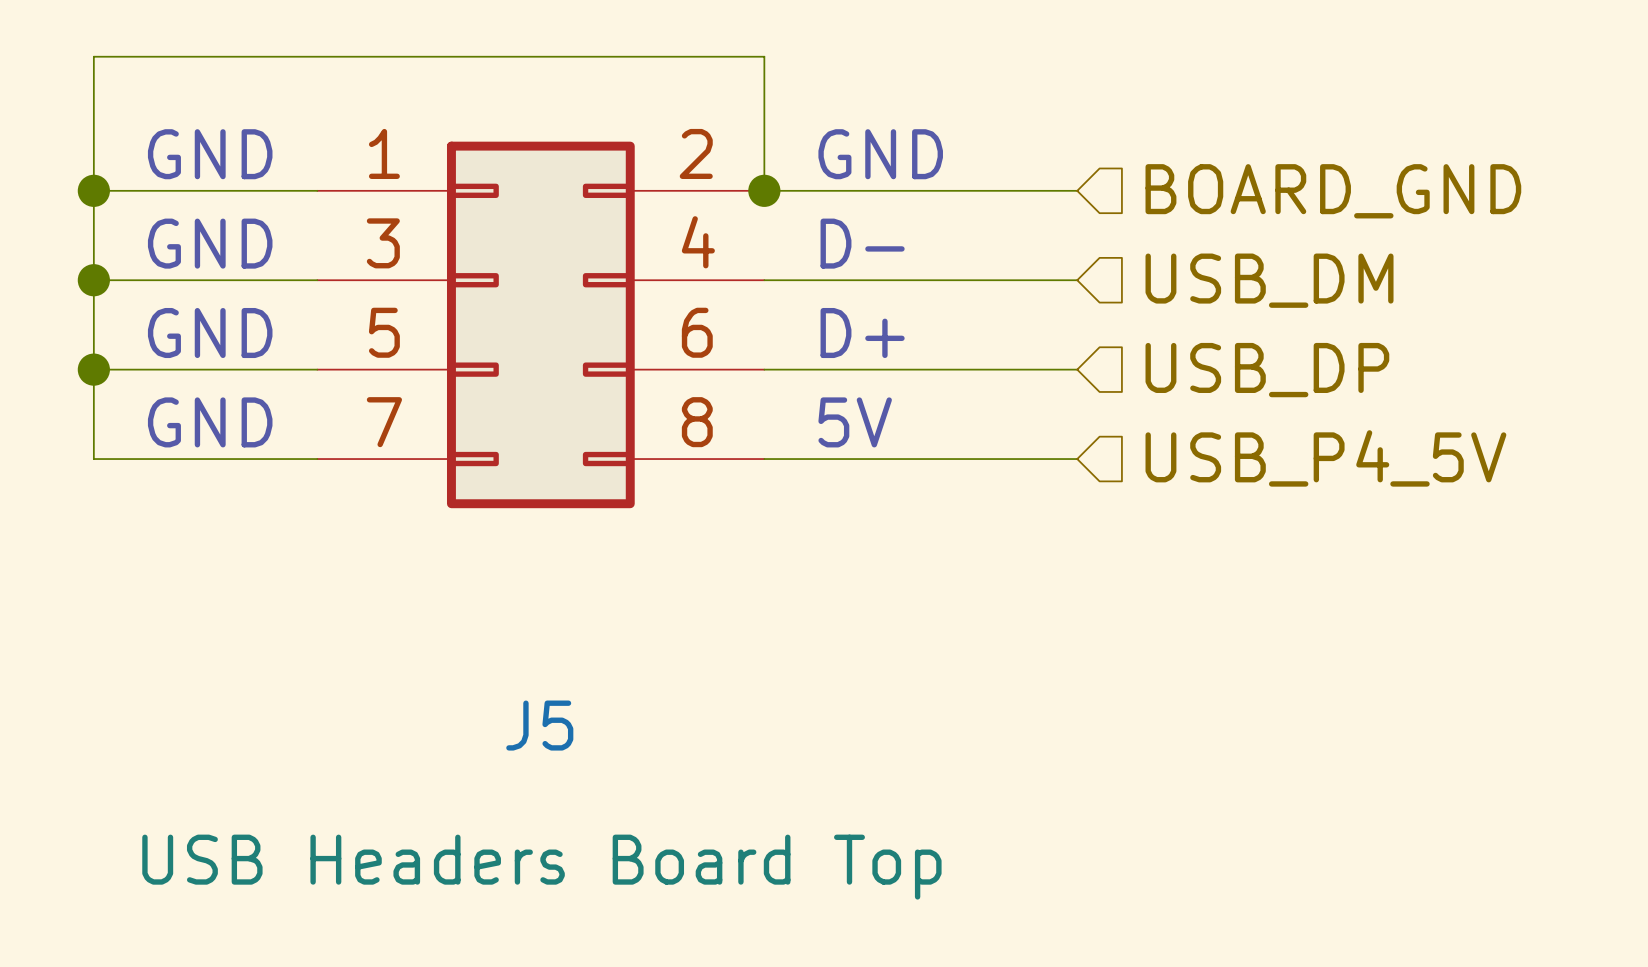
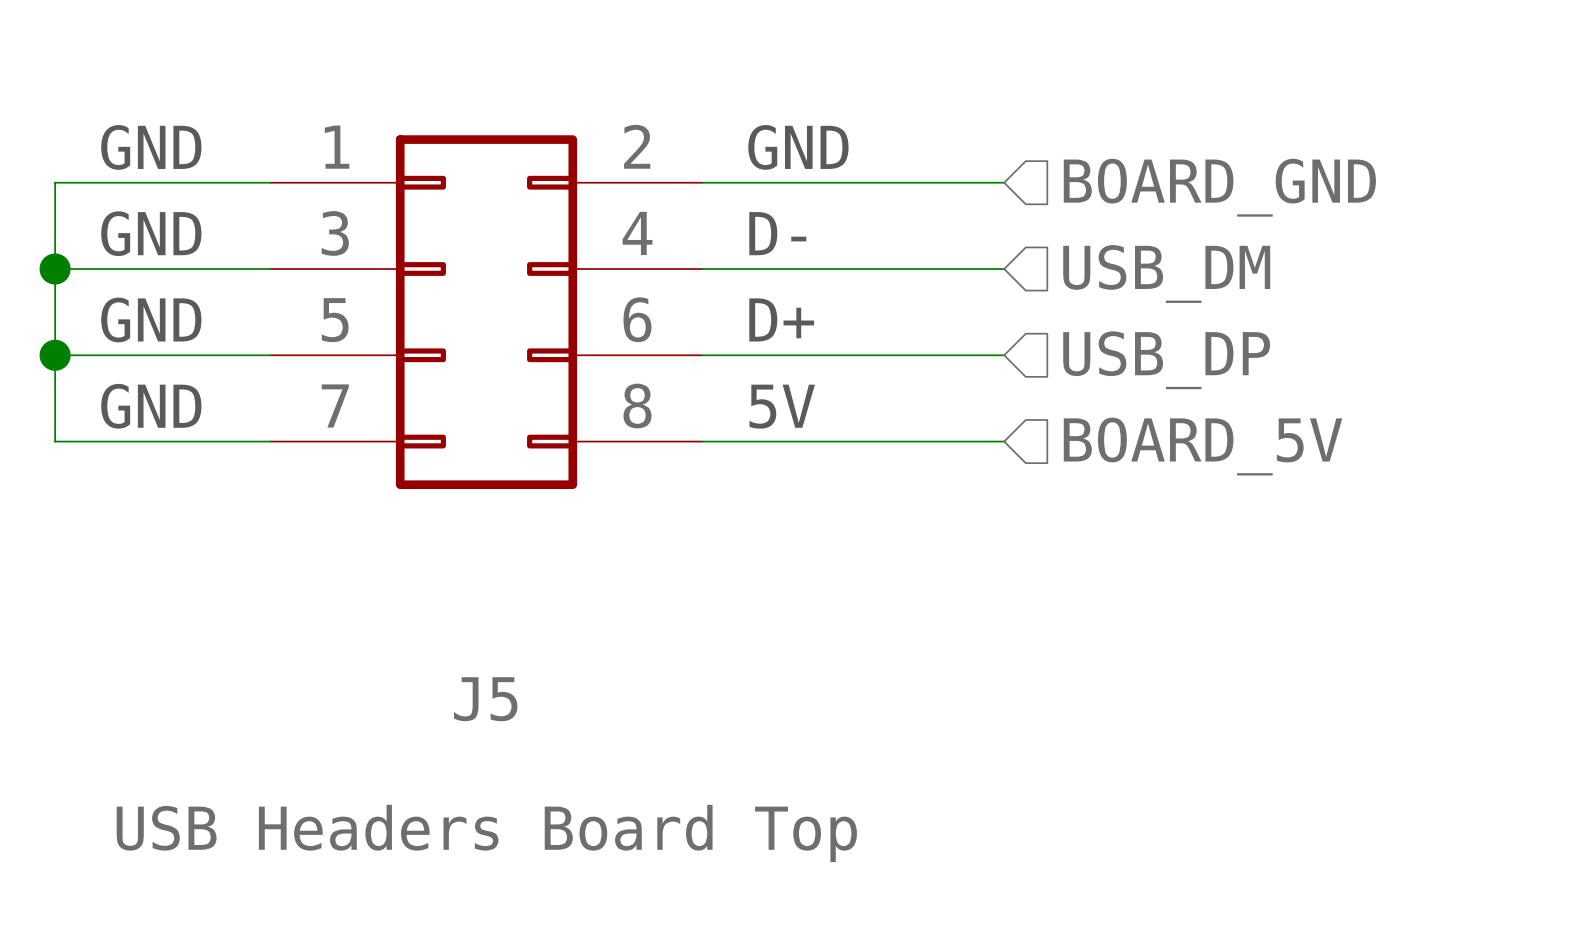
wire: (93, 190) (93, 56) (764, 56) (764, 190) -> none
junction: (93, 190) -> none
junction: (764, 190) -> none
hierarchical label: USB_P4_5V (1325, 458) -> BOARD_5V (1203, 446)

